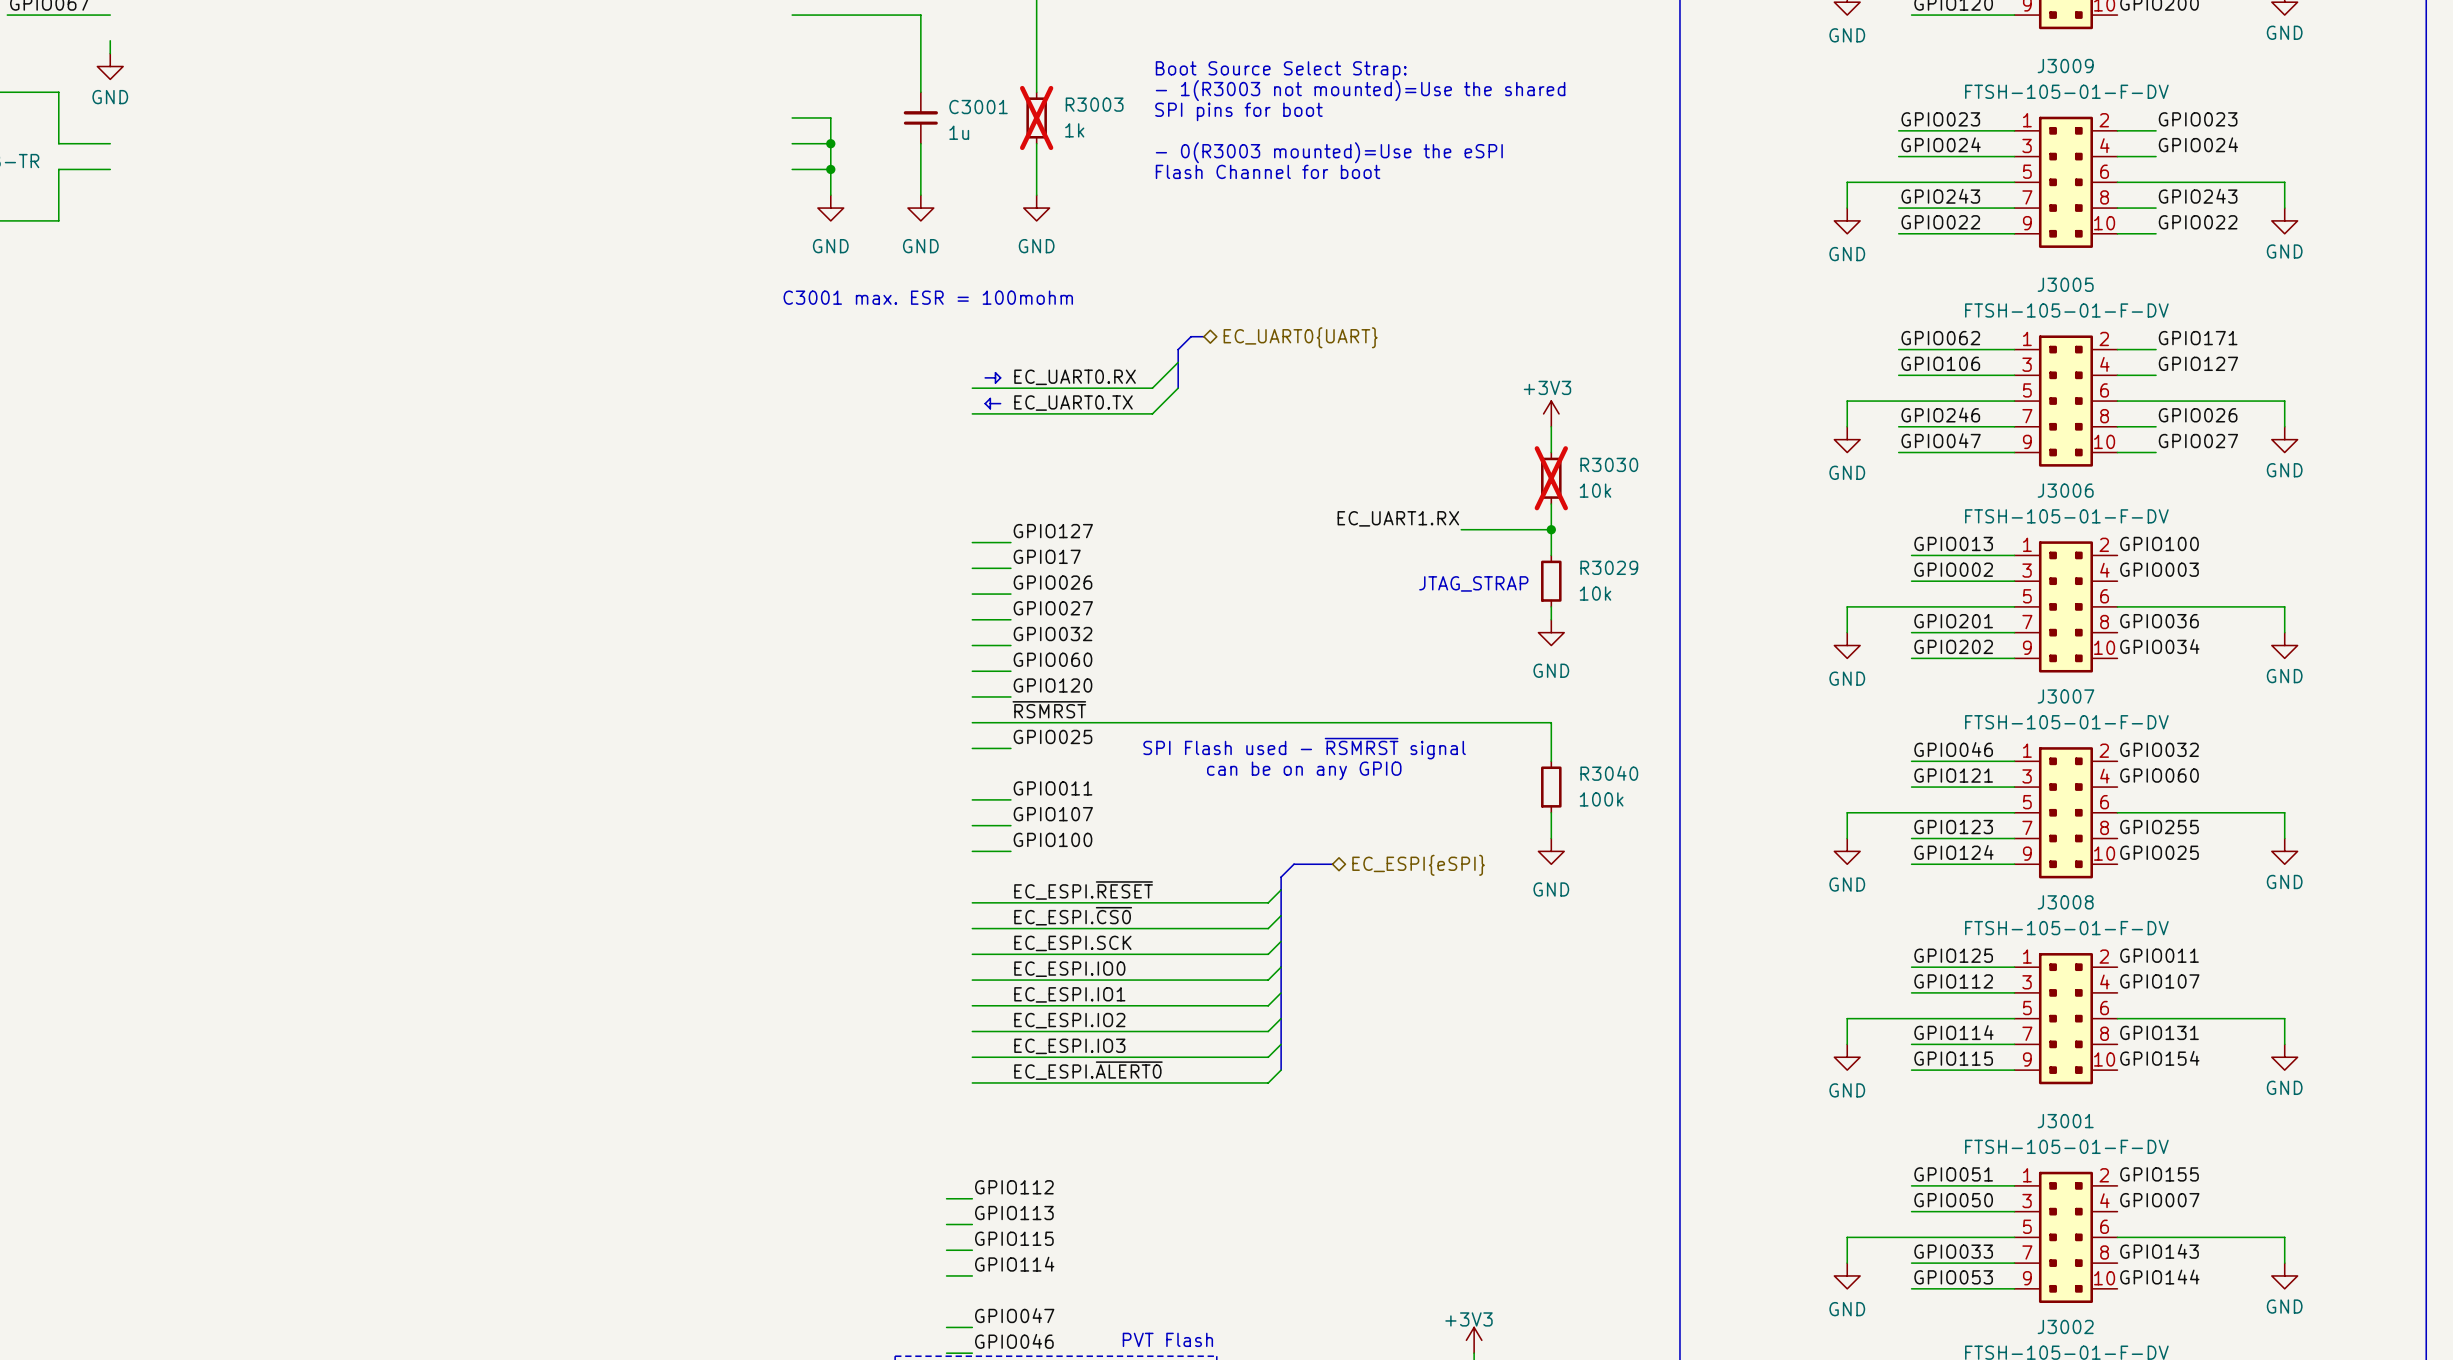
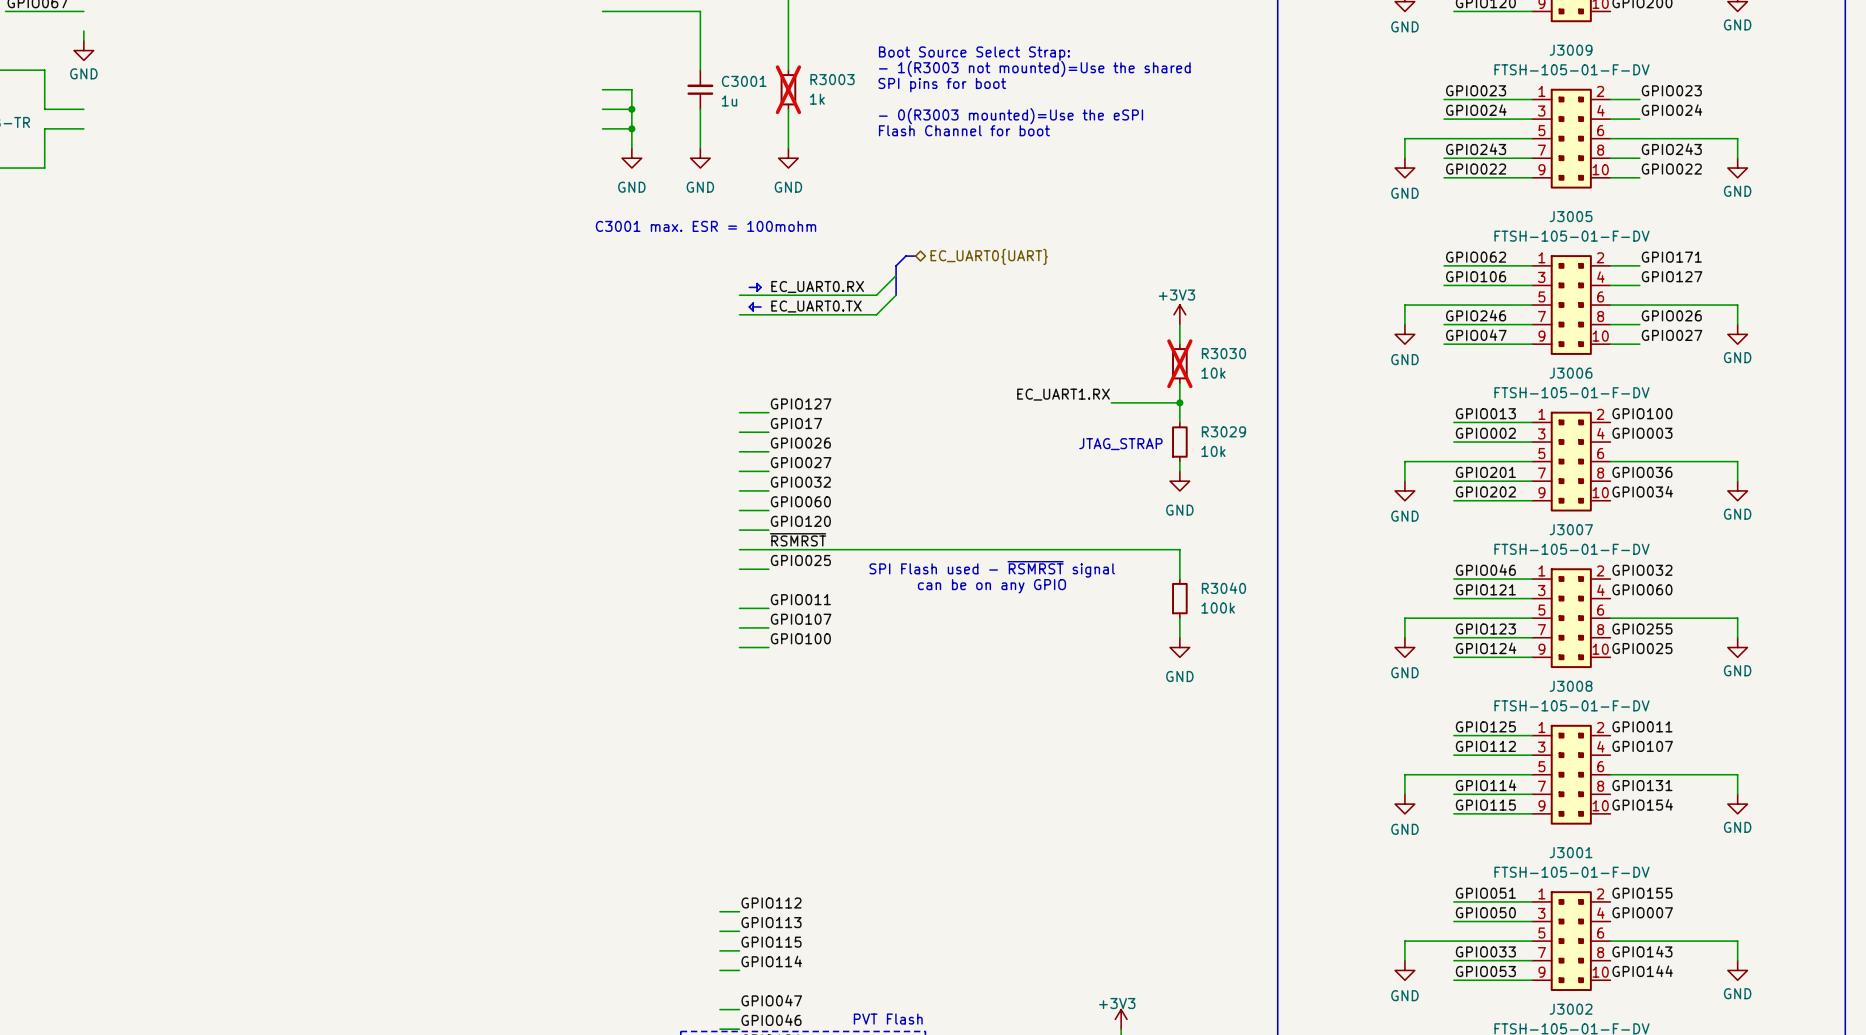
bus: (1332, 864) (1293, 864) (1281, 877) (1281, 1070) -> none
hierarchical label: EC_ESPI{eSPI} (1418, 865) -> none
wire: (1281, 889) (1268, 902) (972, 902) -> none
label: EC_ESPI.~{RESET} (1083, 890) -> none
wire: (1281, 915) (1268, 928) (972, 928) -> none
label: EC_ESPI.~{CS0} (1073, 916) -> none
wire: (1281, 941) (1268, 954) (972, 954) -> none
label: EC_ESPI.SCK (1072, 943) -> none
wire: (1281, 967) (1268, 980) (972, 980) -> none
label: EC_ESPI.IO0 (1069, 969) -> none
wire: (1281, 992) (1268, 1005) (972, 1005) -> none
label: EC_ESPI.IO1 (1069, 994) -> none
wire: (1281, 1018) (1268, 1031) (972, 1031) -> none
label: EC_ESPI.IO2 (1069, 1020) -> none
wire: (1281, 1044) (1268, 1057) (972, 1057) -> none
label: EC_ESPI.IO3 (1069, 1046) -> none
label: EC_ESPI.~{ALERT0} (1088, 1070) -> none
wire: (1281, 1070) (1268, 1082) (972, 1082) -> none

